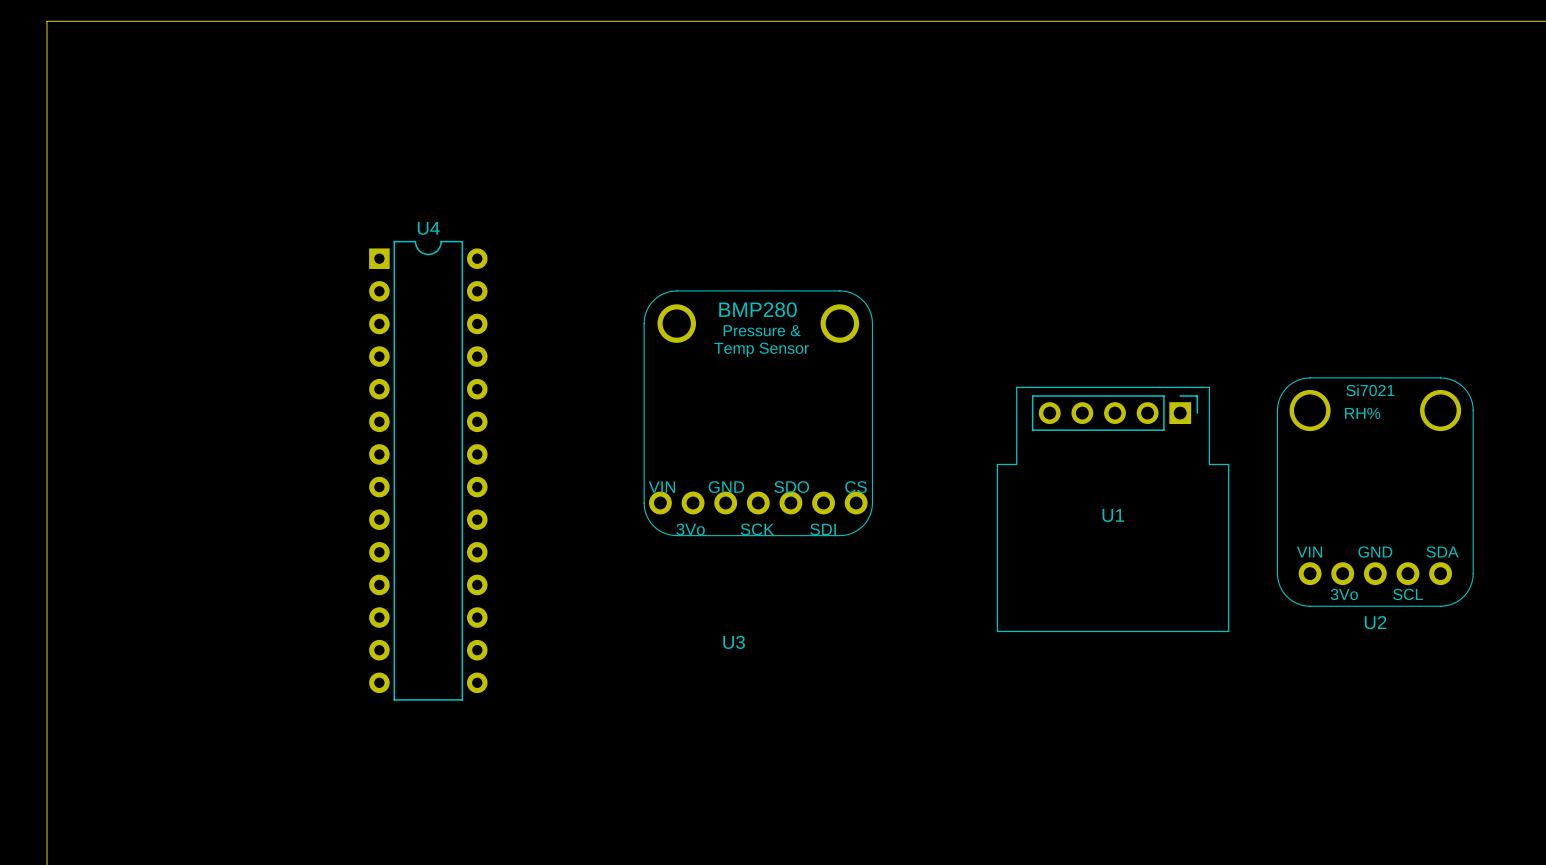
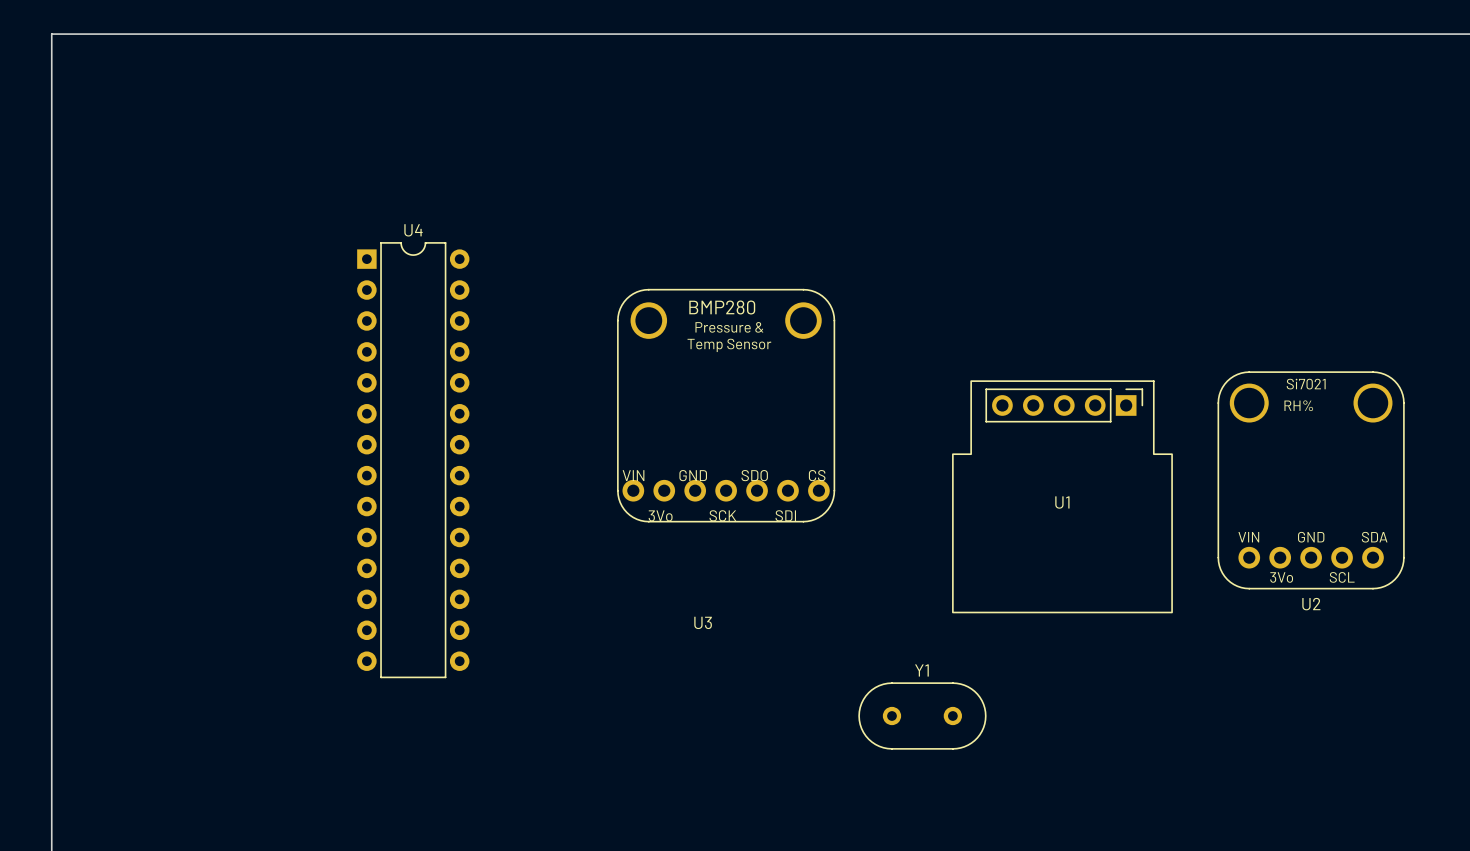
Y1: none -> (922, 716)

